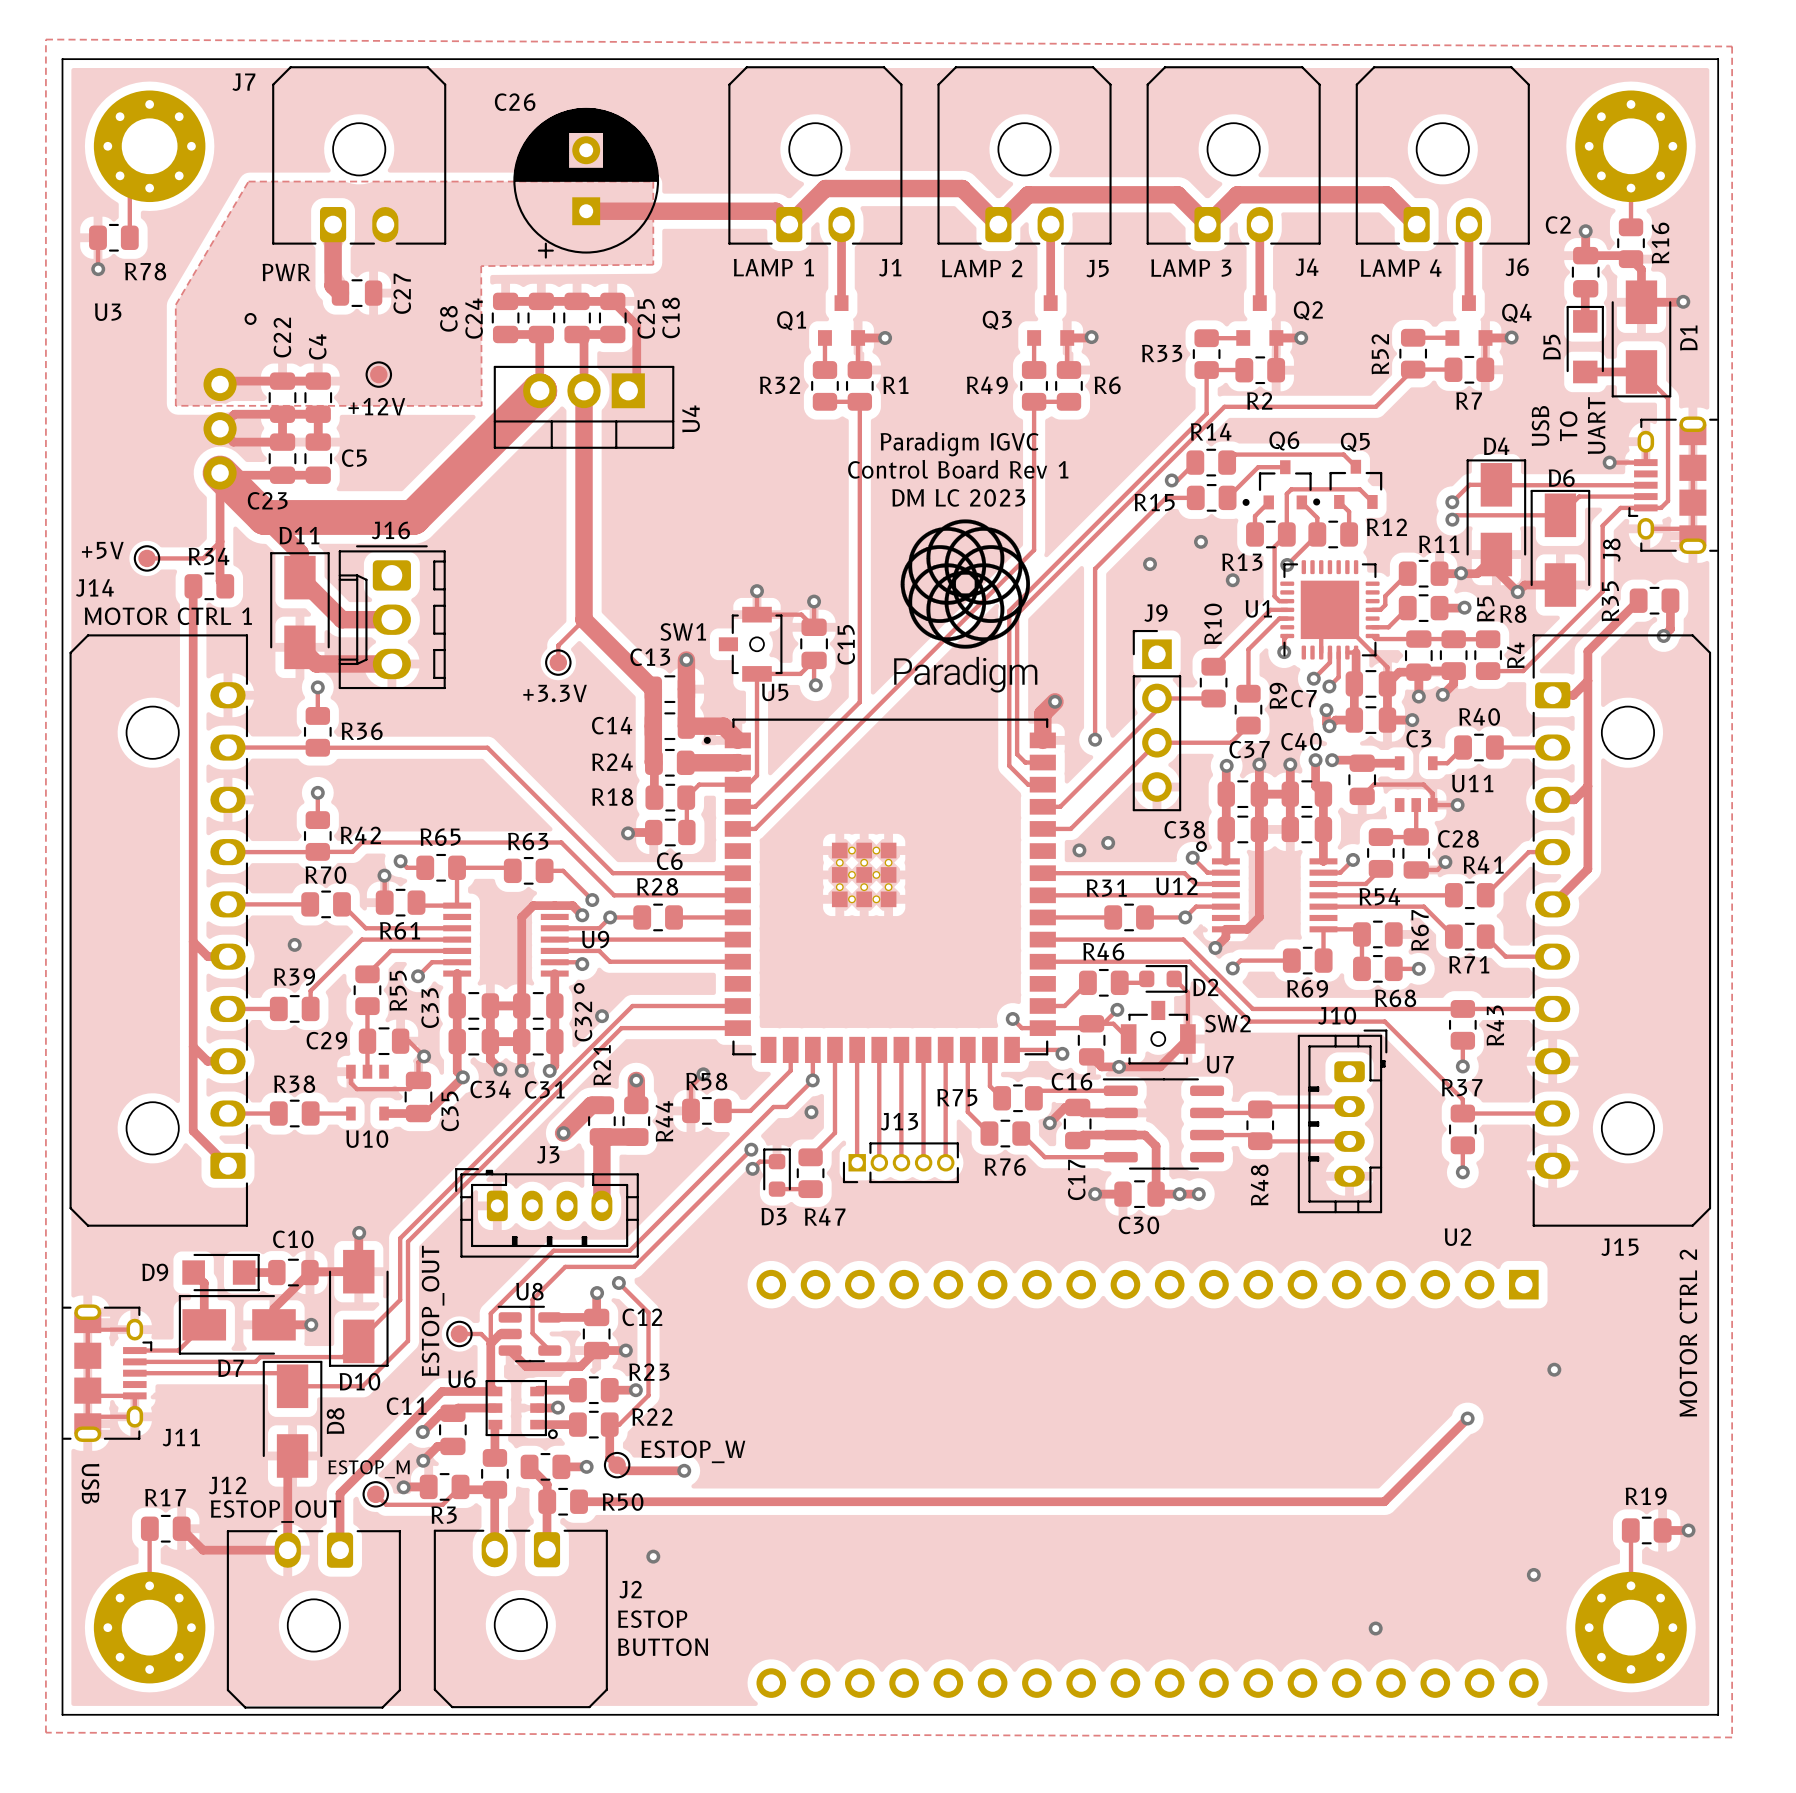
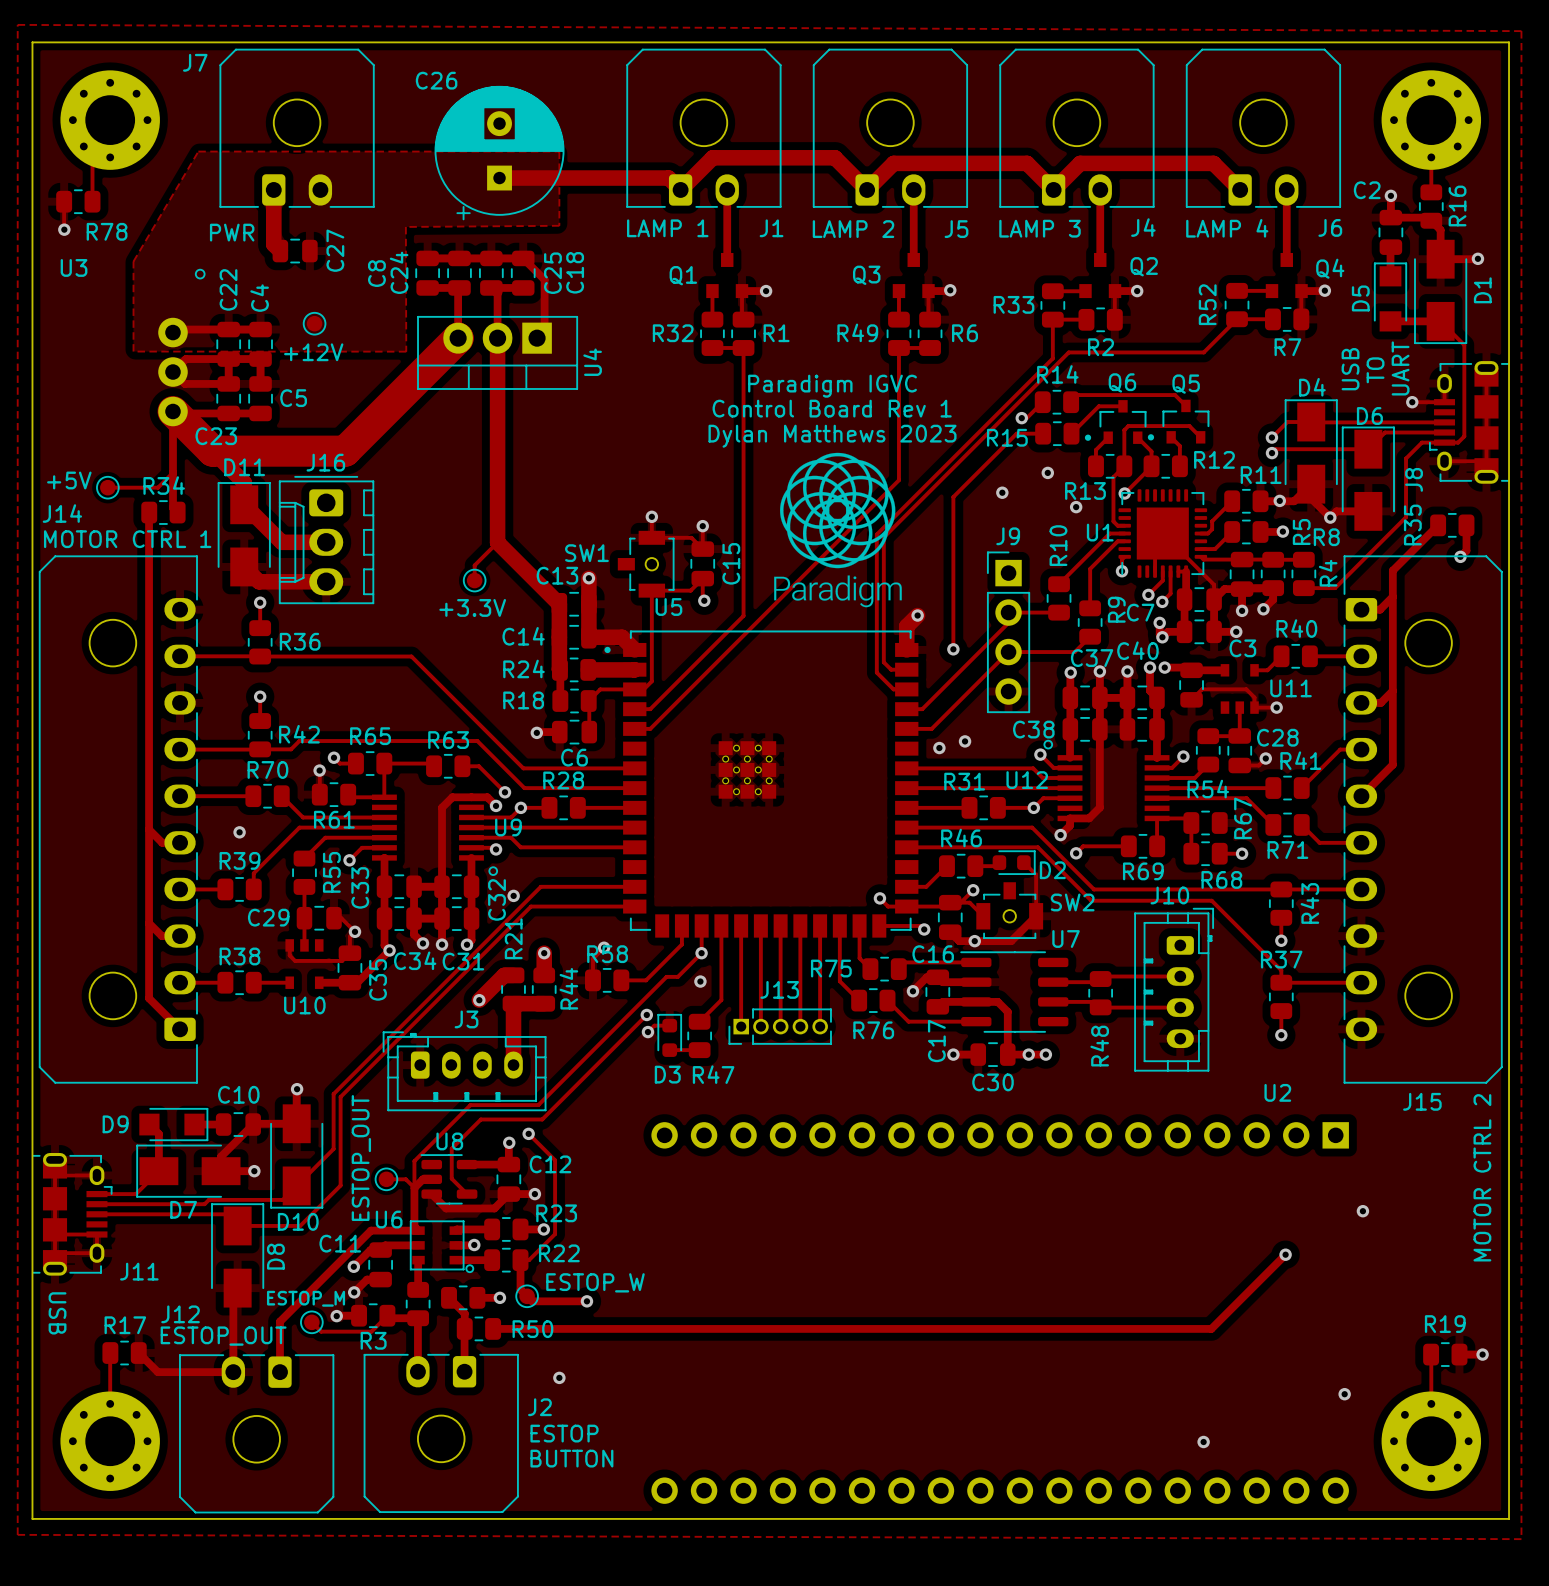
text: DM LC 2023 (958, 497) -> Dylan Matthews 2023 (832, 436)

